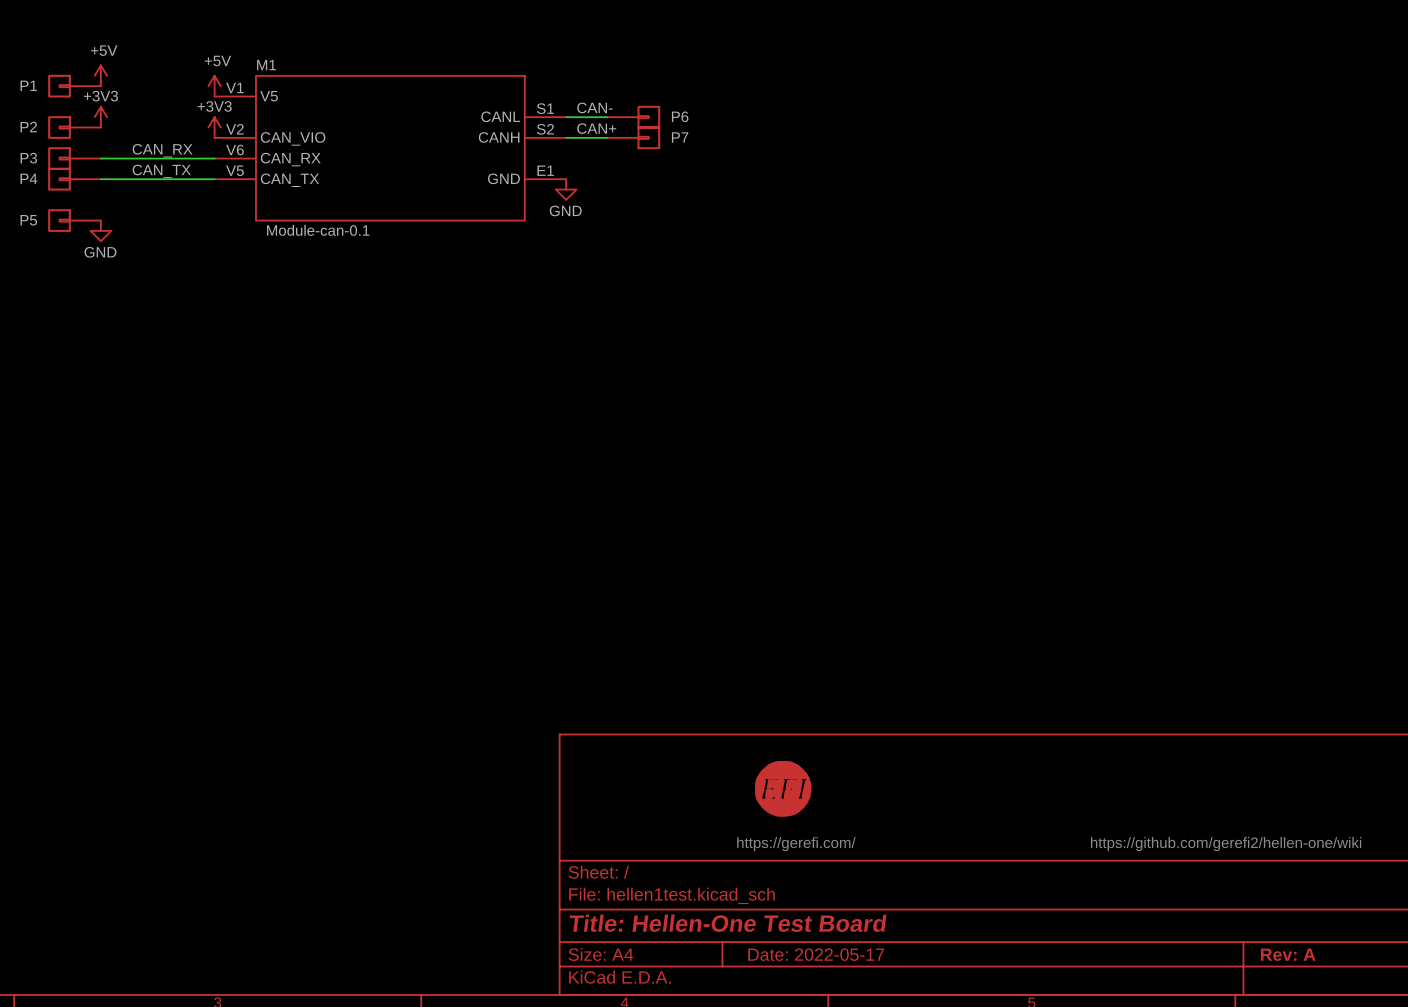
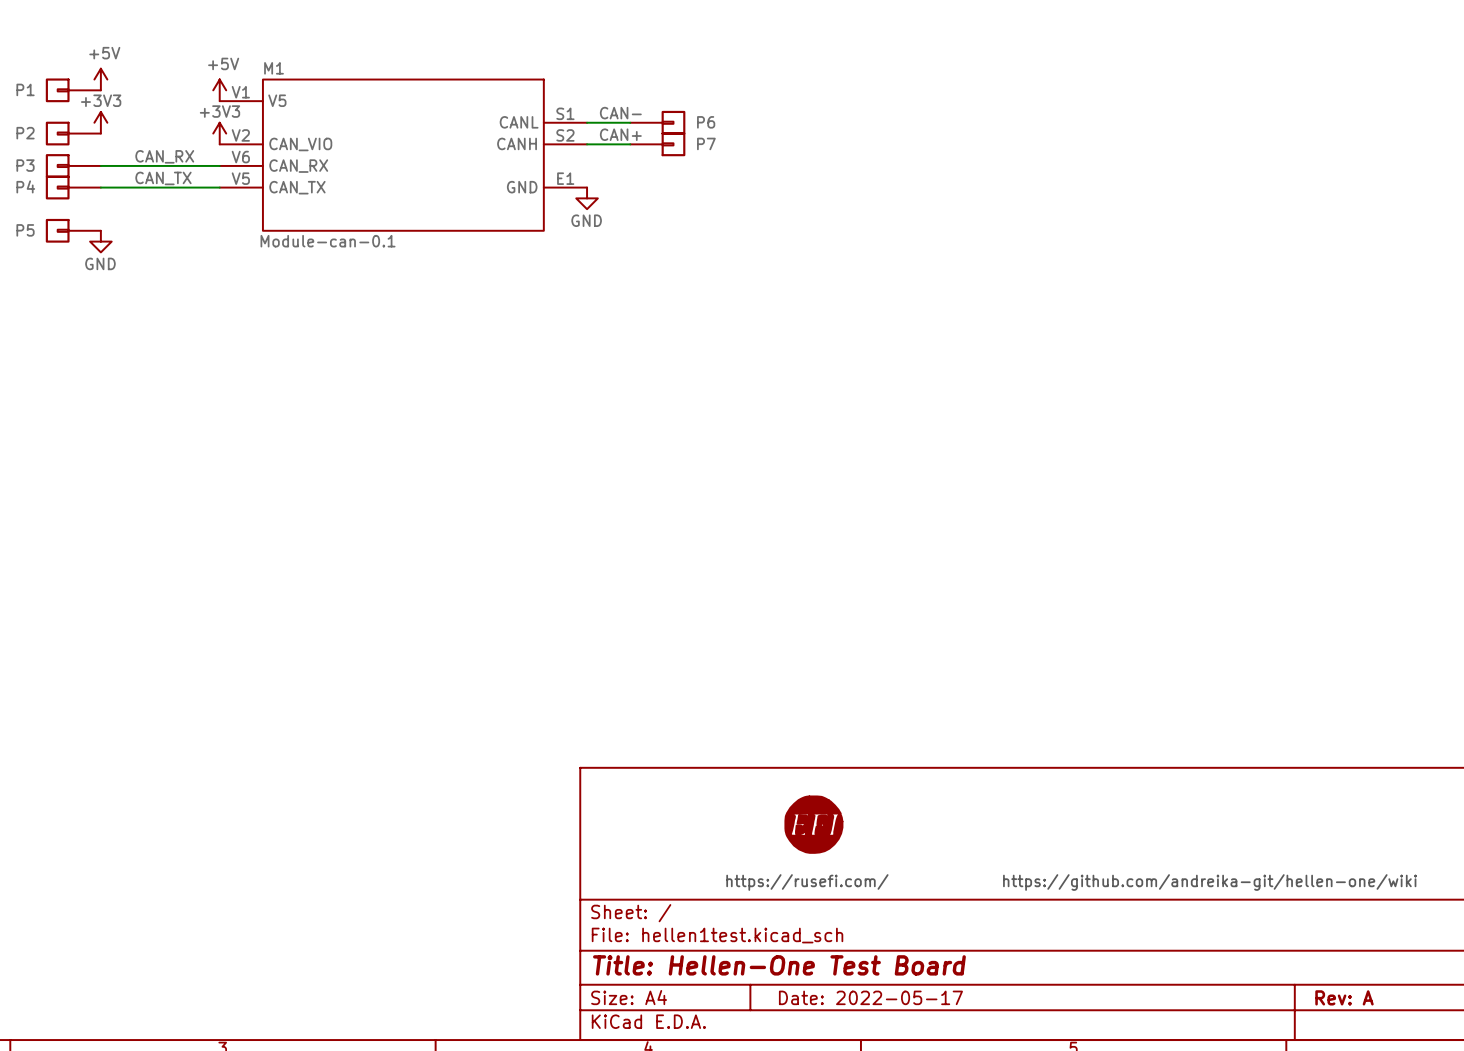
text: https://gerefi.com/ (796, 844) -> https://rusefi.com/ (807, 882)
text: https://github.com/gerefi2/hellen-one/wiki (1226, 844) -> https://github.com/andreika-git/hellen-one/wiki (1209, 882)

